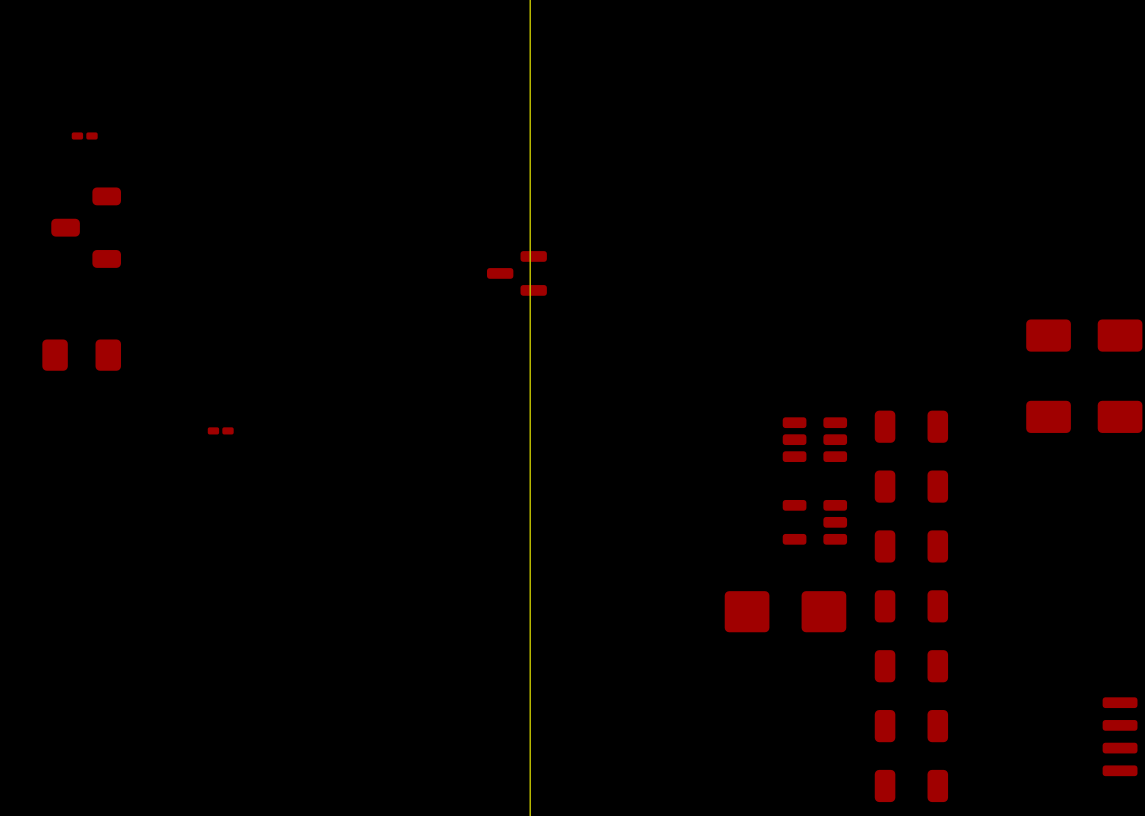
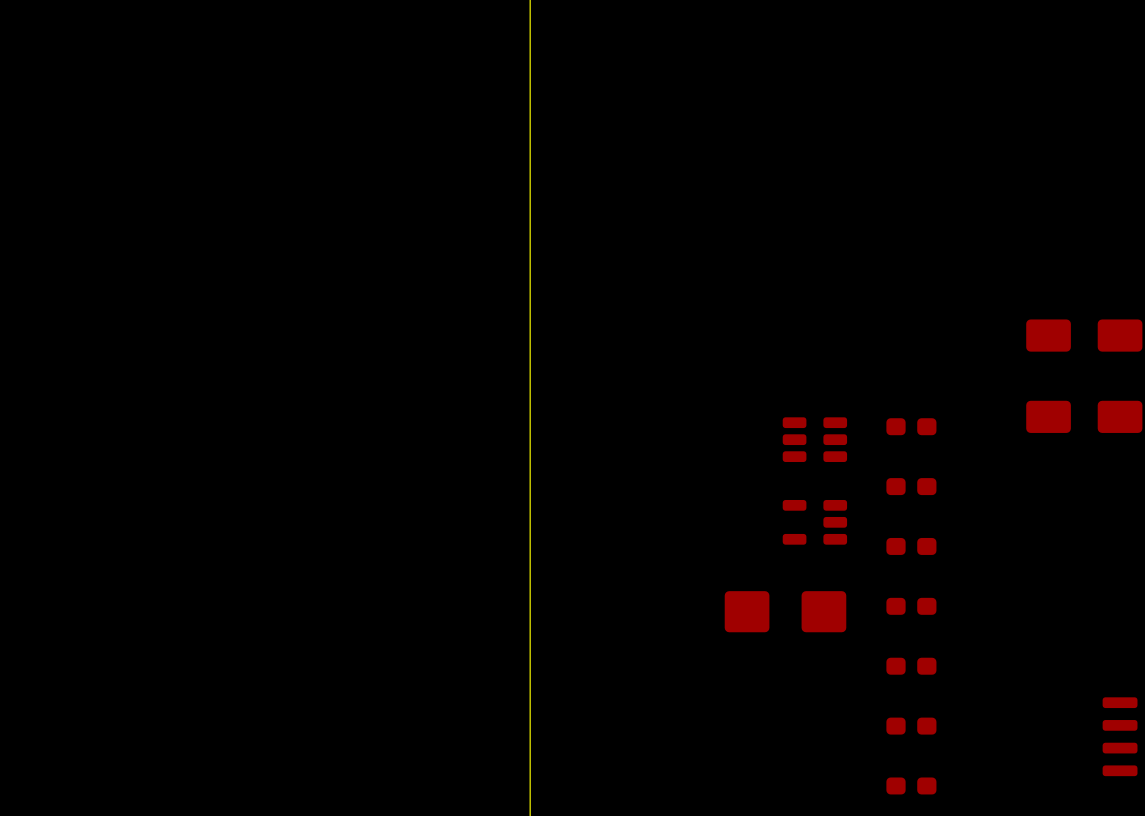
part: (84, 135) -> none
part: (86, 227) -> none
part: (516, 273) -> none
part: (81, 355) -> none
part footprint: [874, 410, 949, 443] -> [886, 418, 937, 436]
part: (220, 430) -> none
part footprint: [874, 470, 949, 503] -> [886, 478, 937, 496]
part footprint: [874, 530, 949, 563] -> [886, 537, 937, 555]
part footprint: [874, 590, 949, 623] -> [886, 597, 937, 615]
part footprint: [874, 650, 949, 683] -> [886, 657, 937, 675]
part footprint: [874, 710, 949, 743] -> [886, 717, 937, 735]
part footprint: [874, 769, 949, 803] -> [886, 777, 937, 795]

